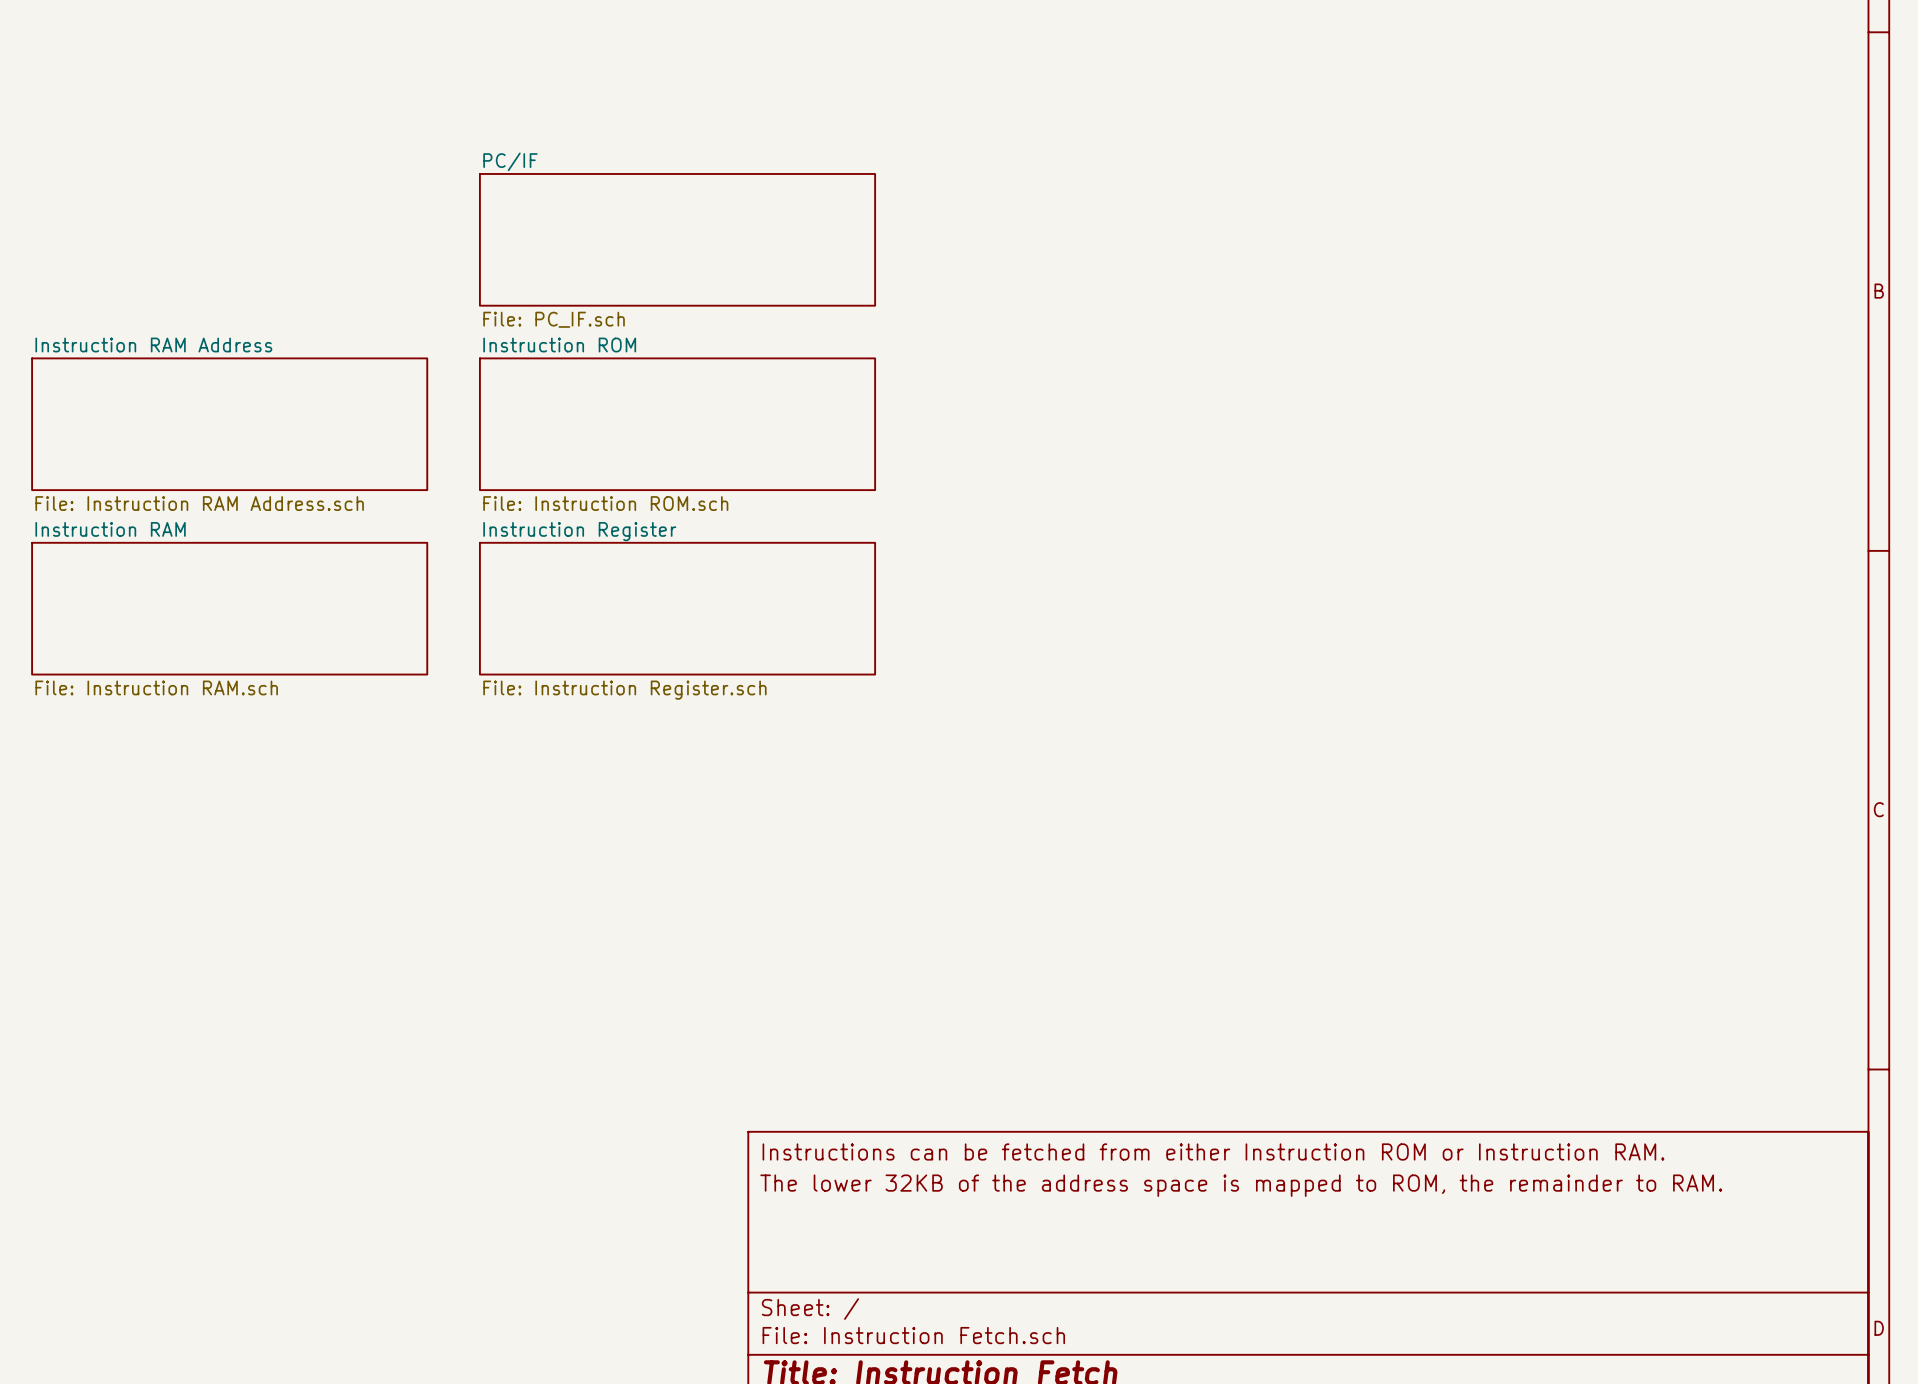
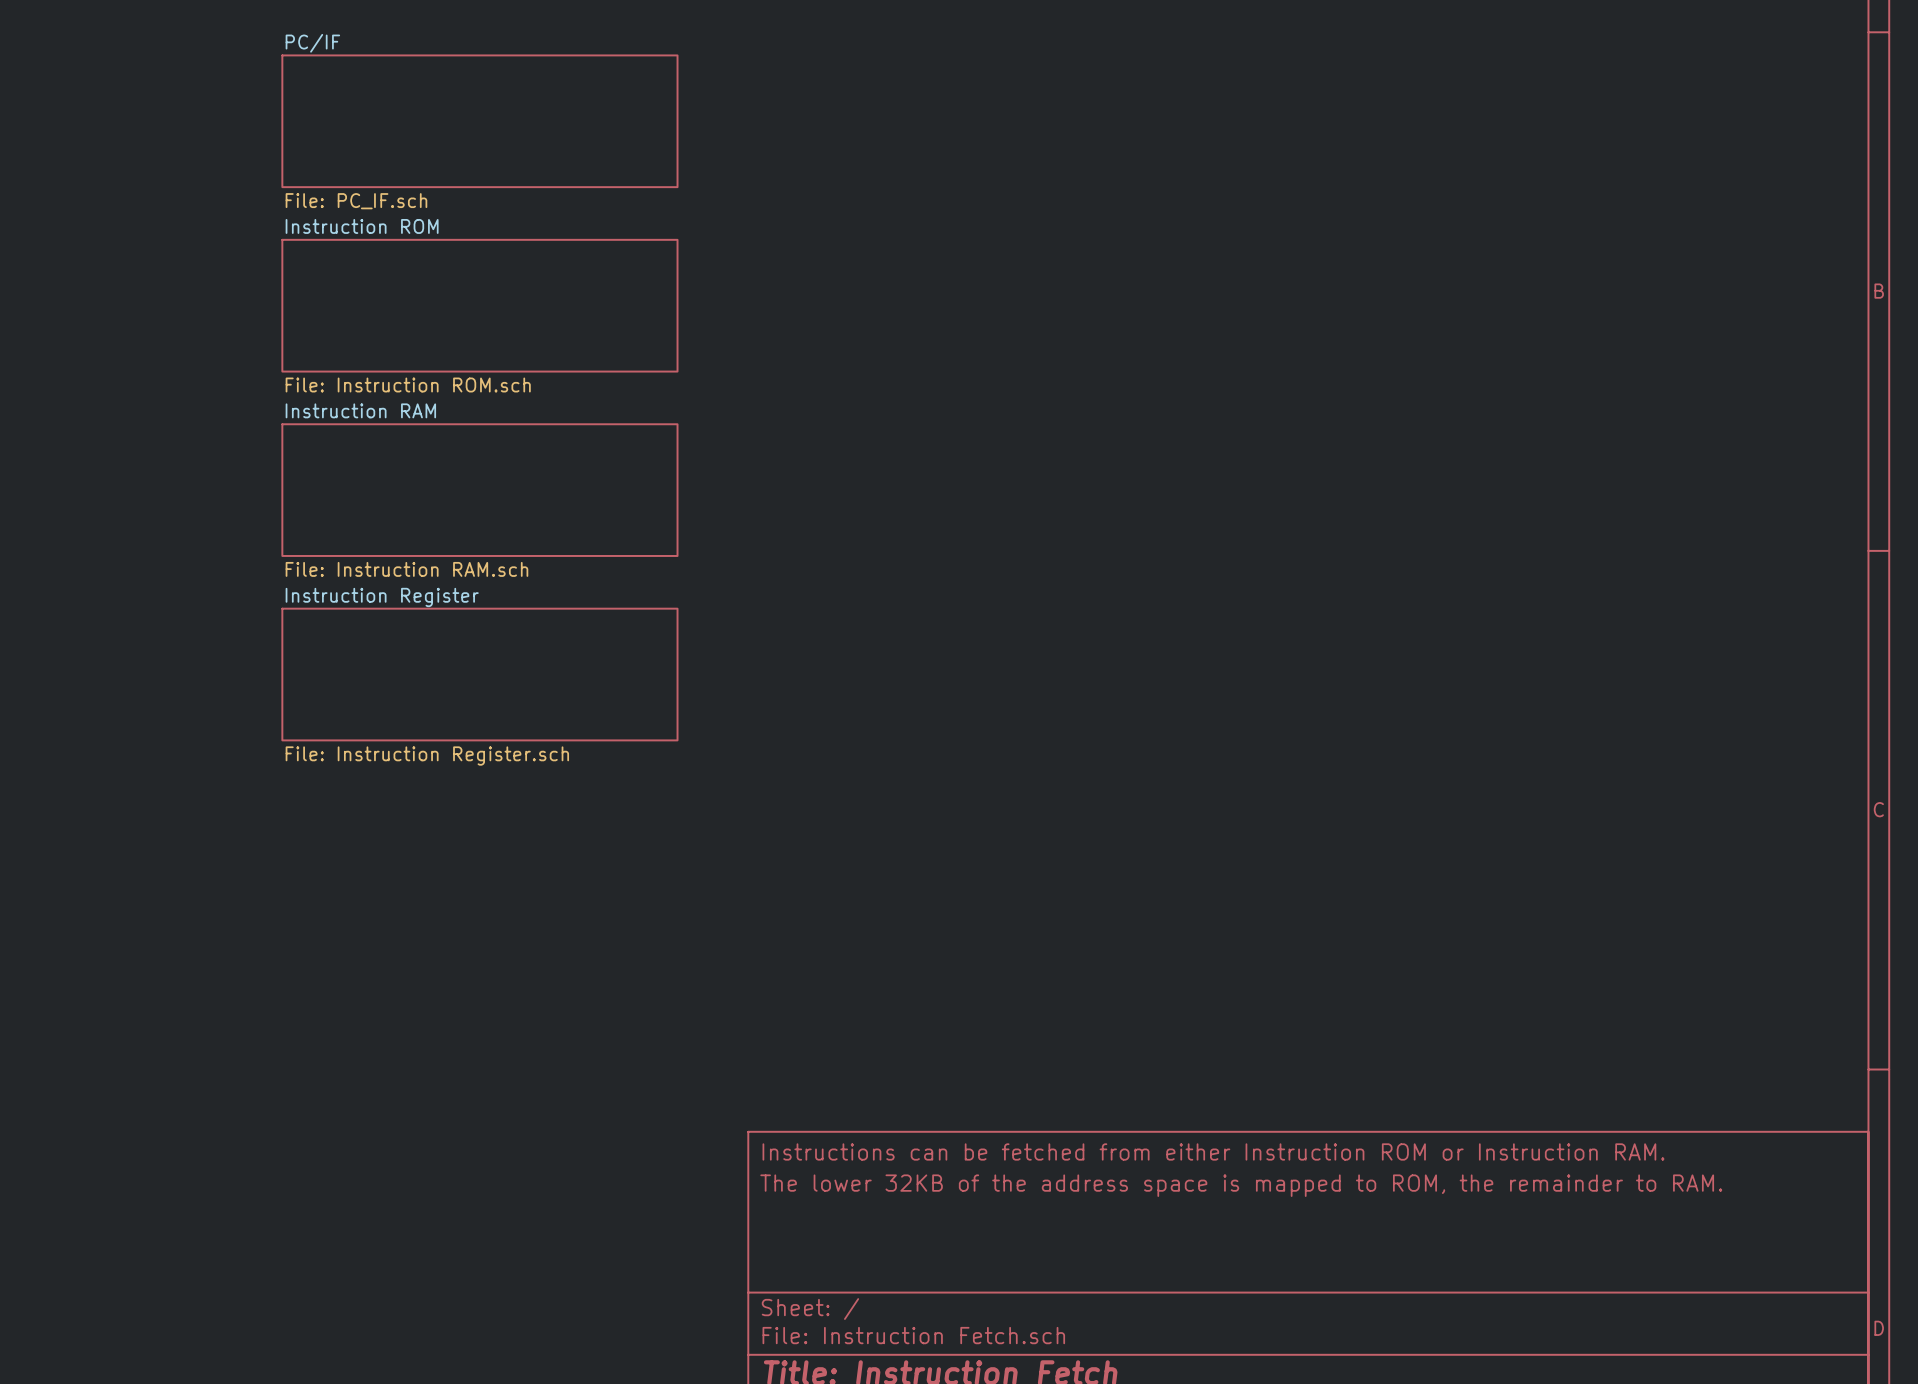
sheet PC/IF position: (677, 239) -> (479, 121)
sheet Instruction RAM Address: File: Instruction RAM Address.sch (229, 424) -> none
sheet Instruction ROM position: (677, 424) -> (479, 305)
sheet Instruction RAM: none -> File: Instruction RAM.sch (479, 490)
sheet Instruction RAM: File: Instruction RAM.sch (229, 608) -> none
sheet Instruction Register position: (677, 608) -> (479, 674)

